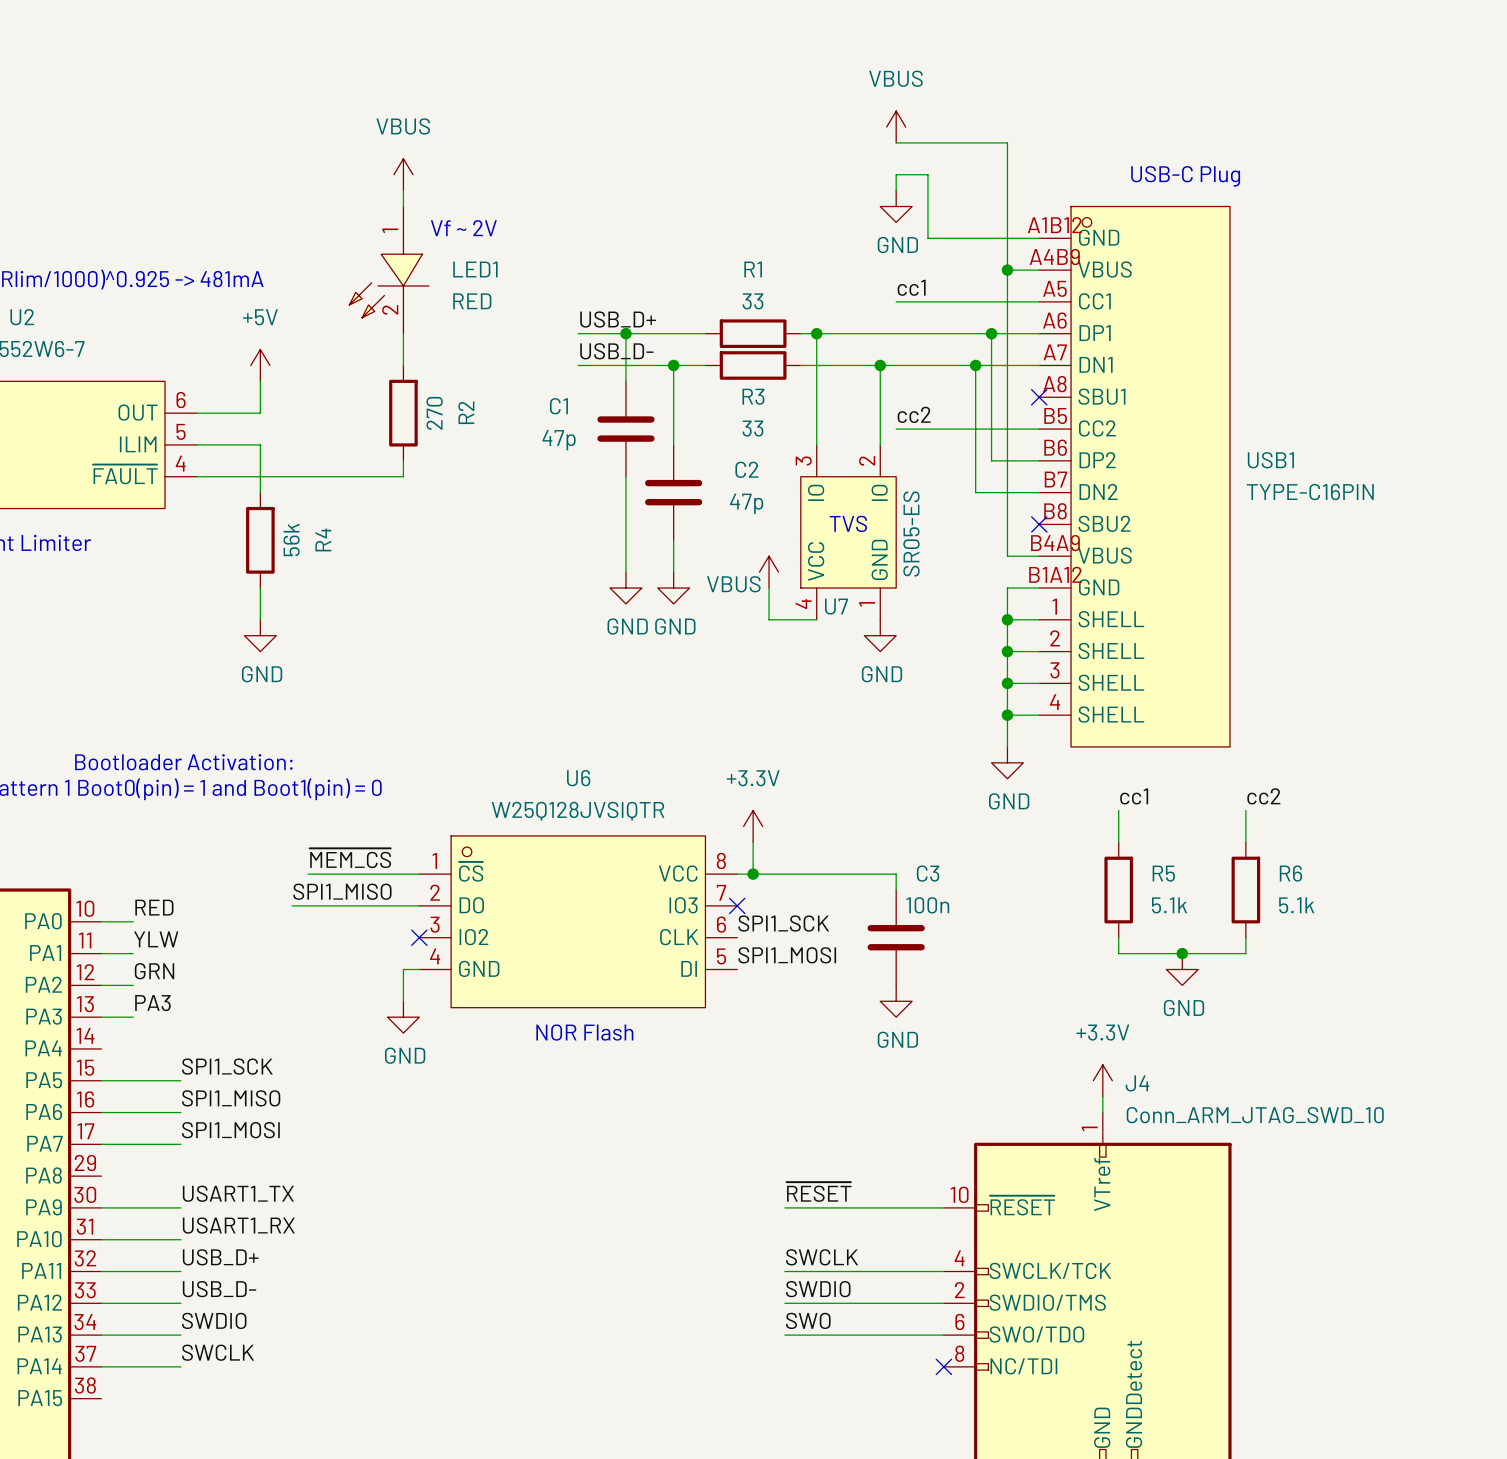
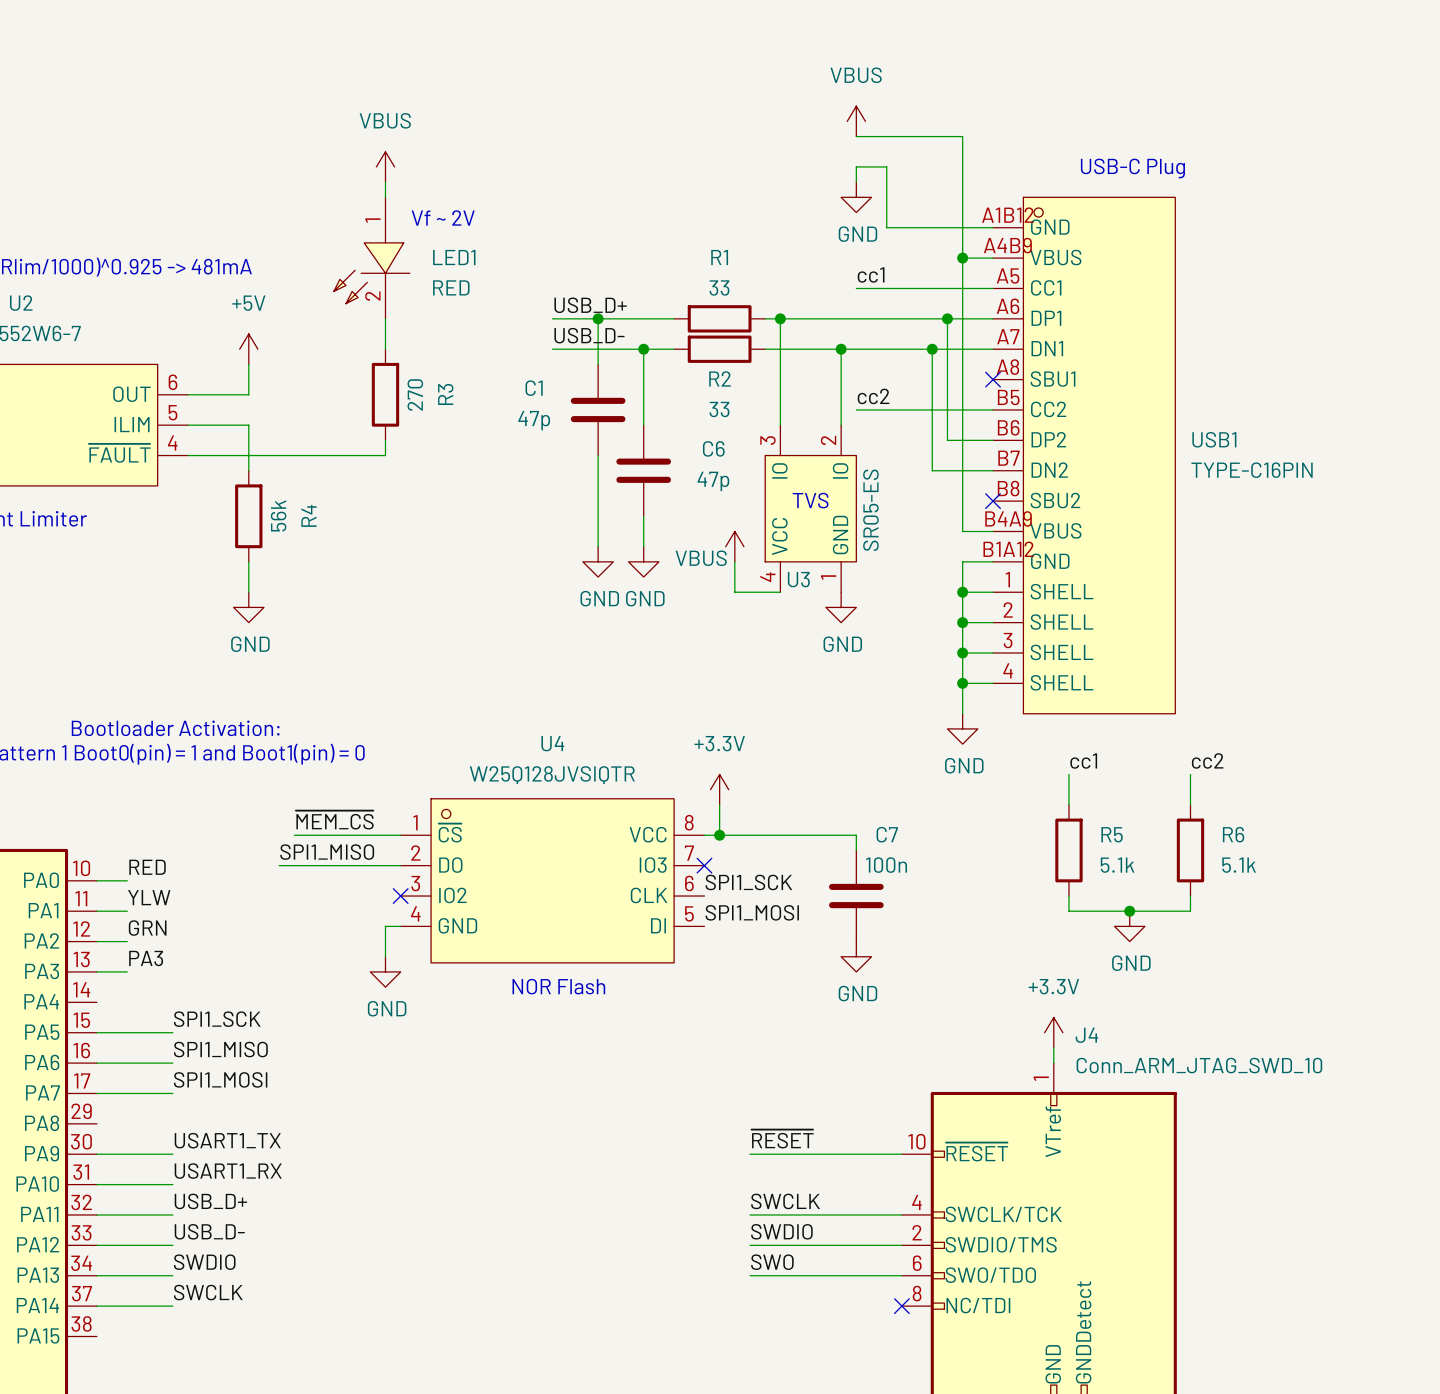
R3 name: R3 (753, 396) -> R2 (720, 378)
R2 name: R2 (466, 412) -> R3 (445, 394)
C2 name: C2 (746, 469) -> C6 (713, 448)
U7 name: U7 (836, 606) -> U3 (798, 579)
U6 name: U6 (578, 778) -> U4 (552, 743)
C3 name: C3 (928, 873) -> C7 (887, 834)

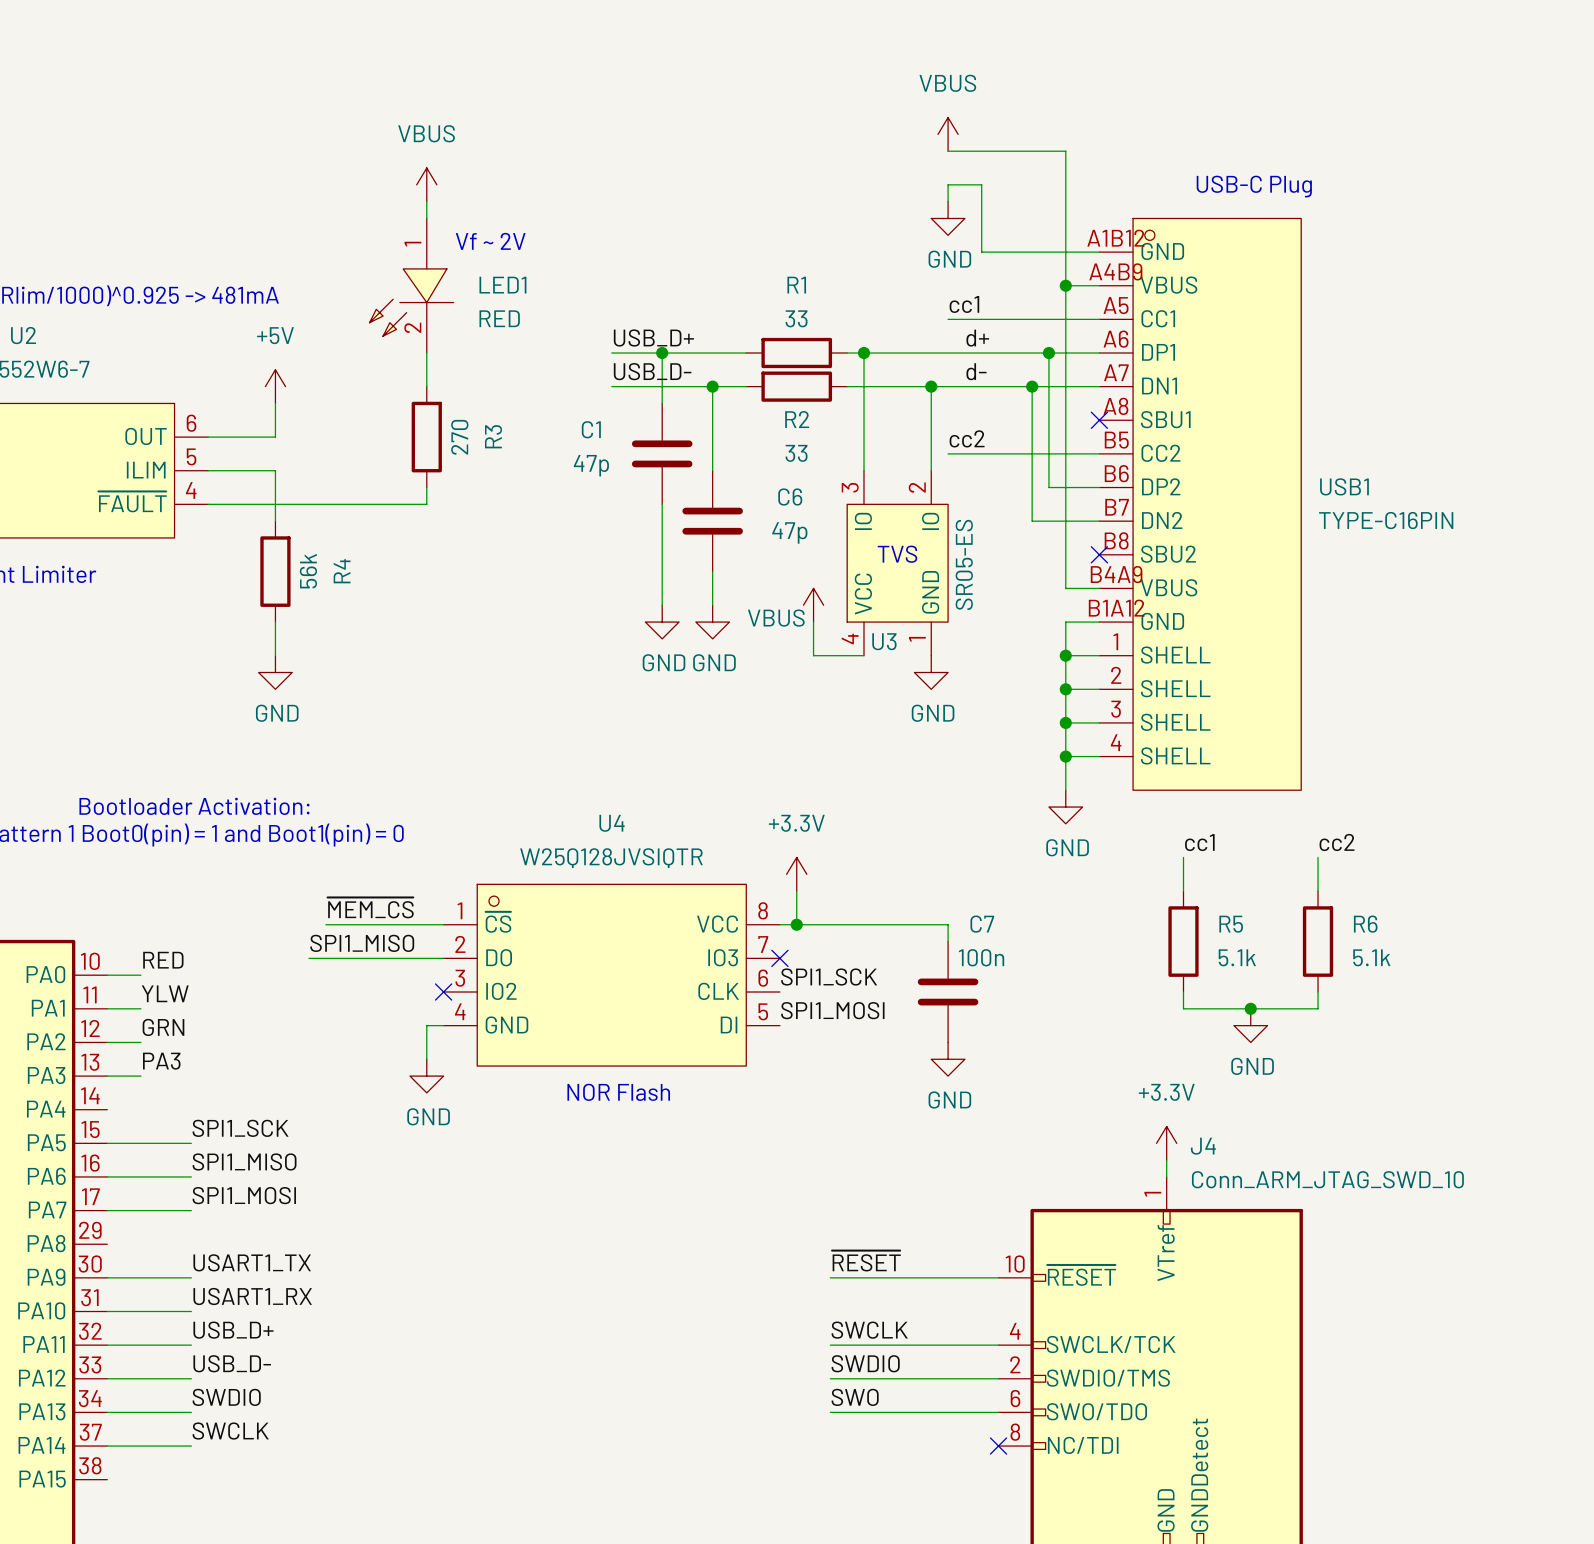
label: none -> d+ (977, 338)
label: none -> d- (976, 371)

